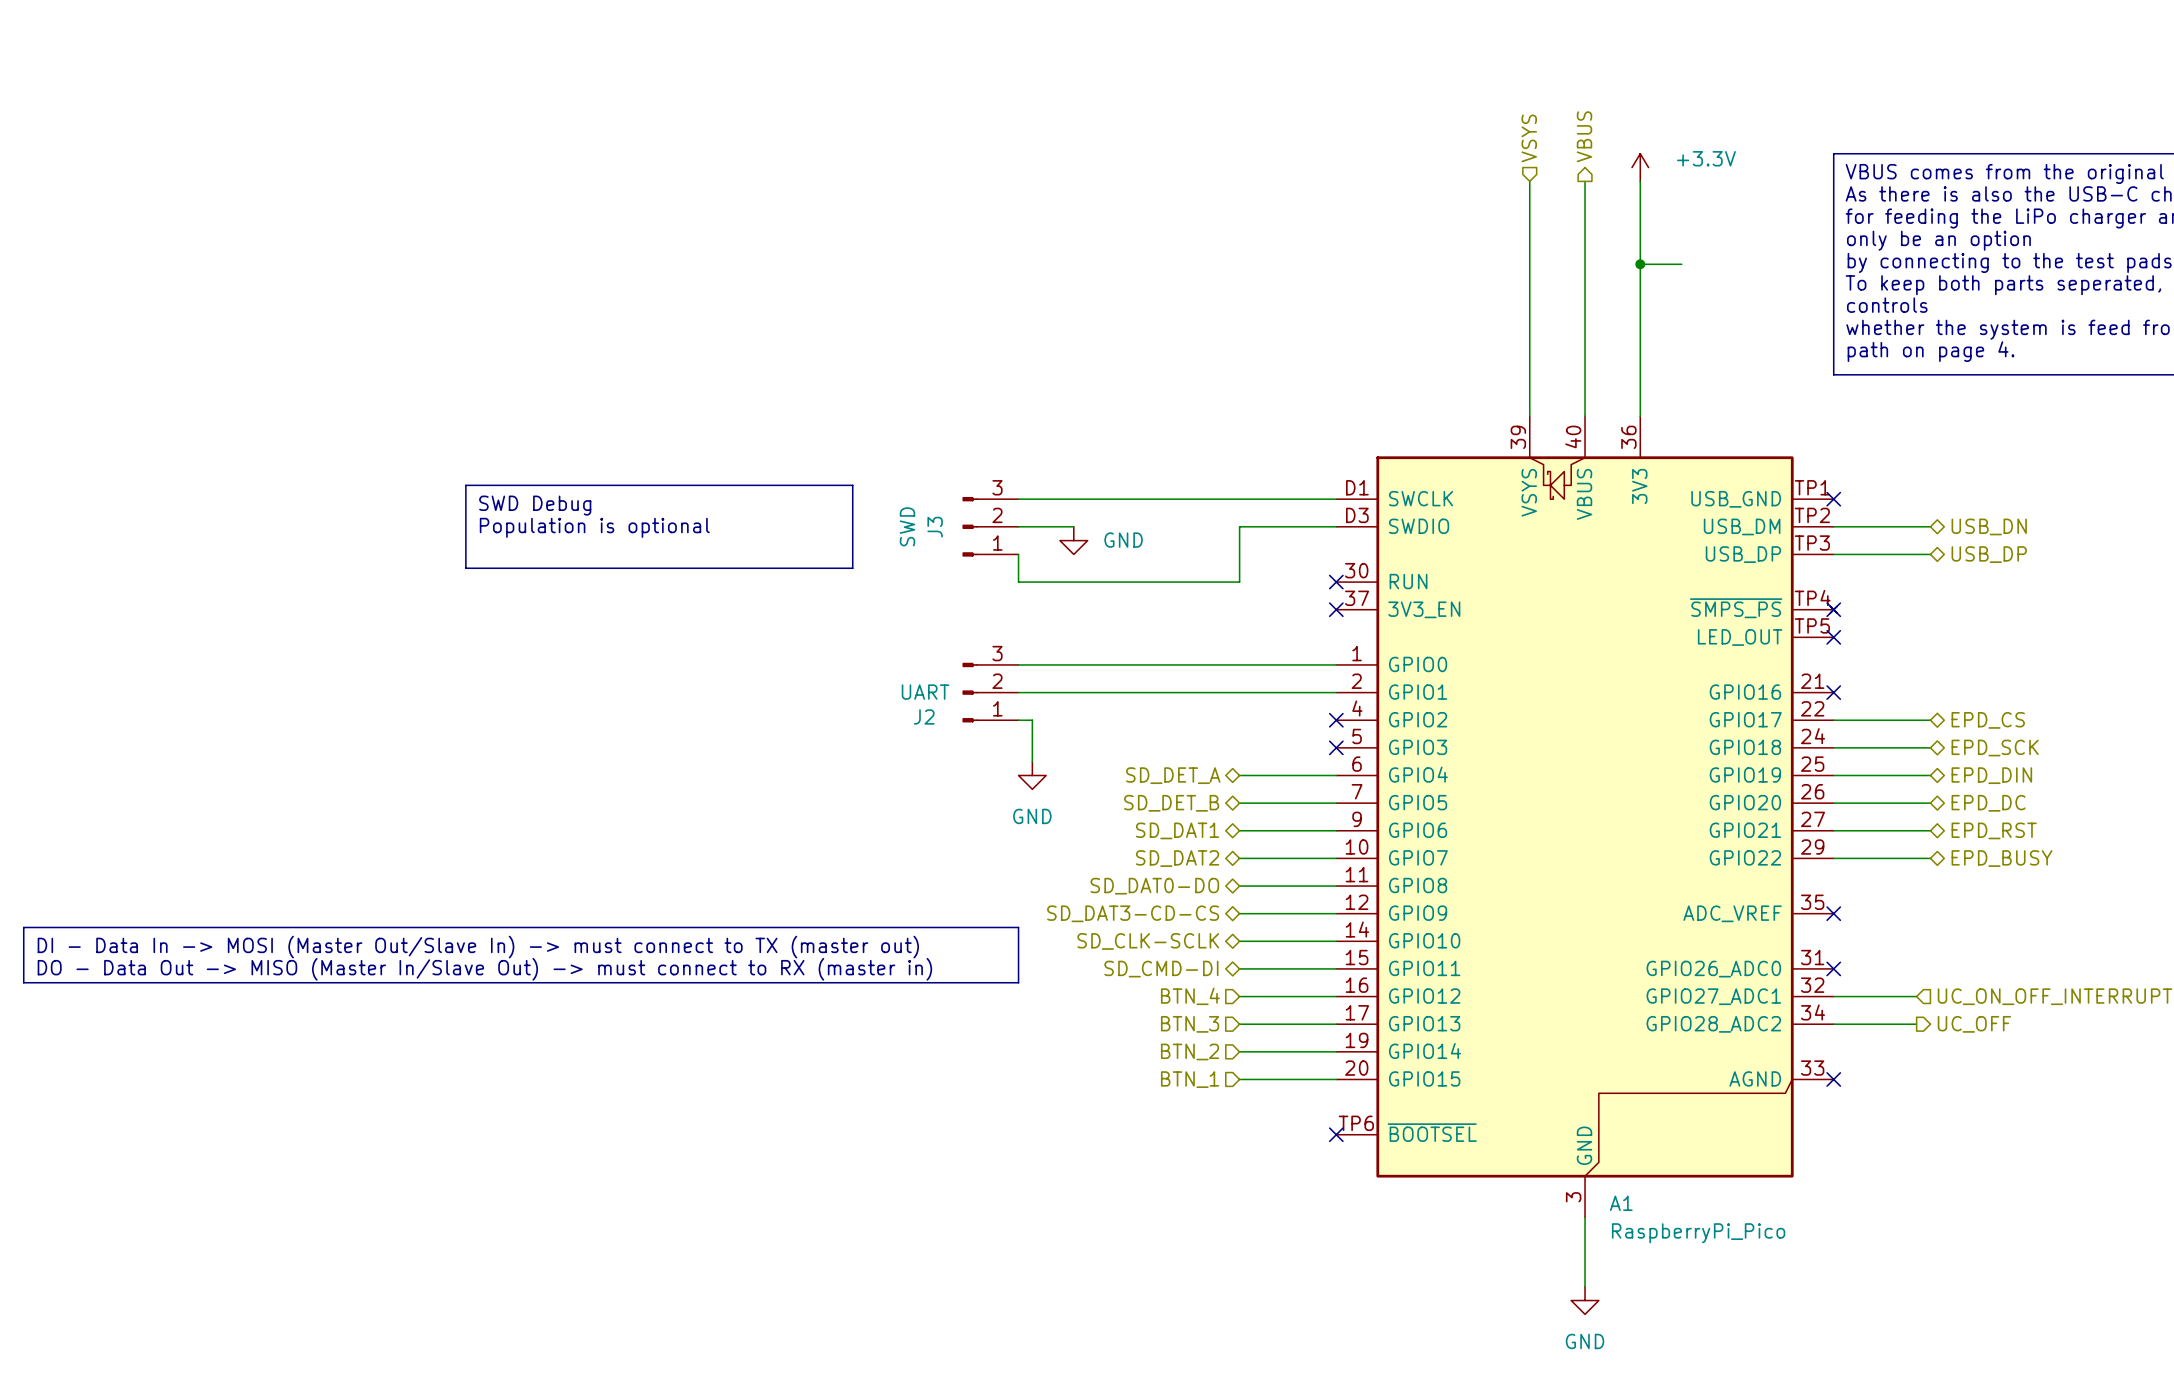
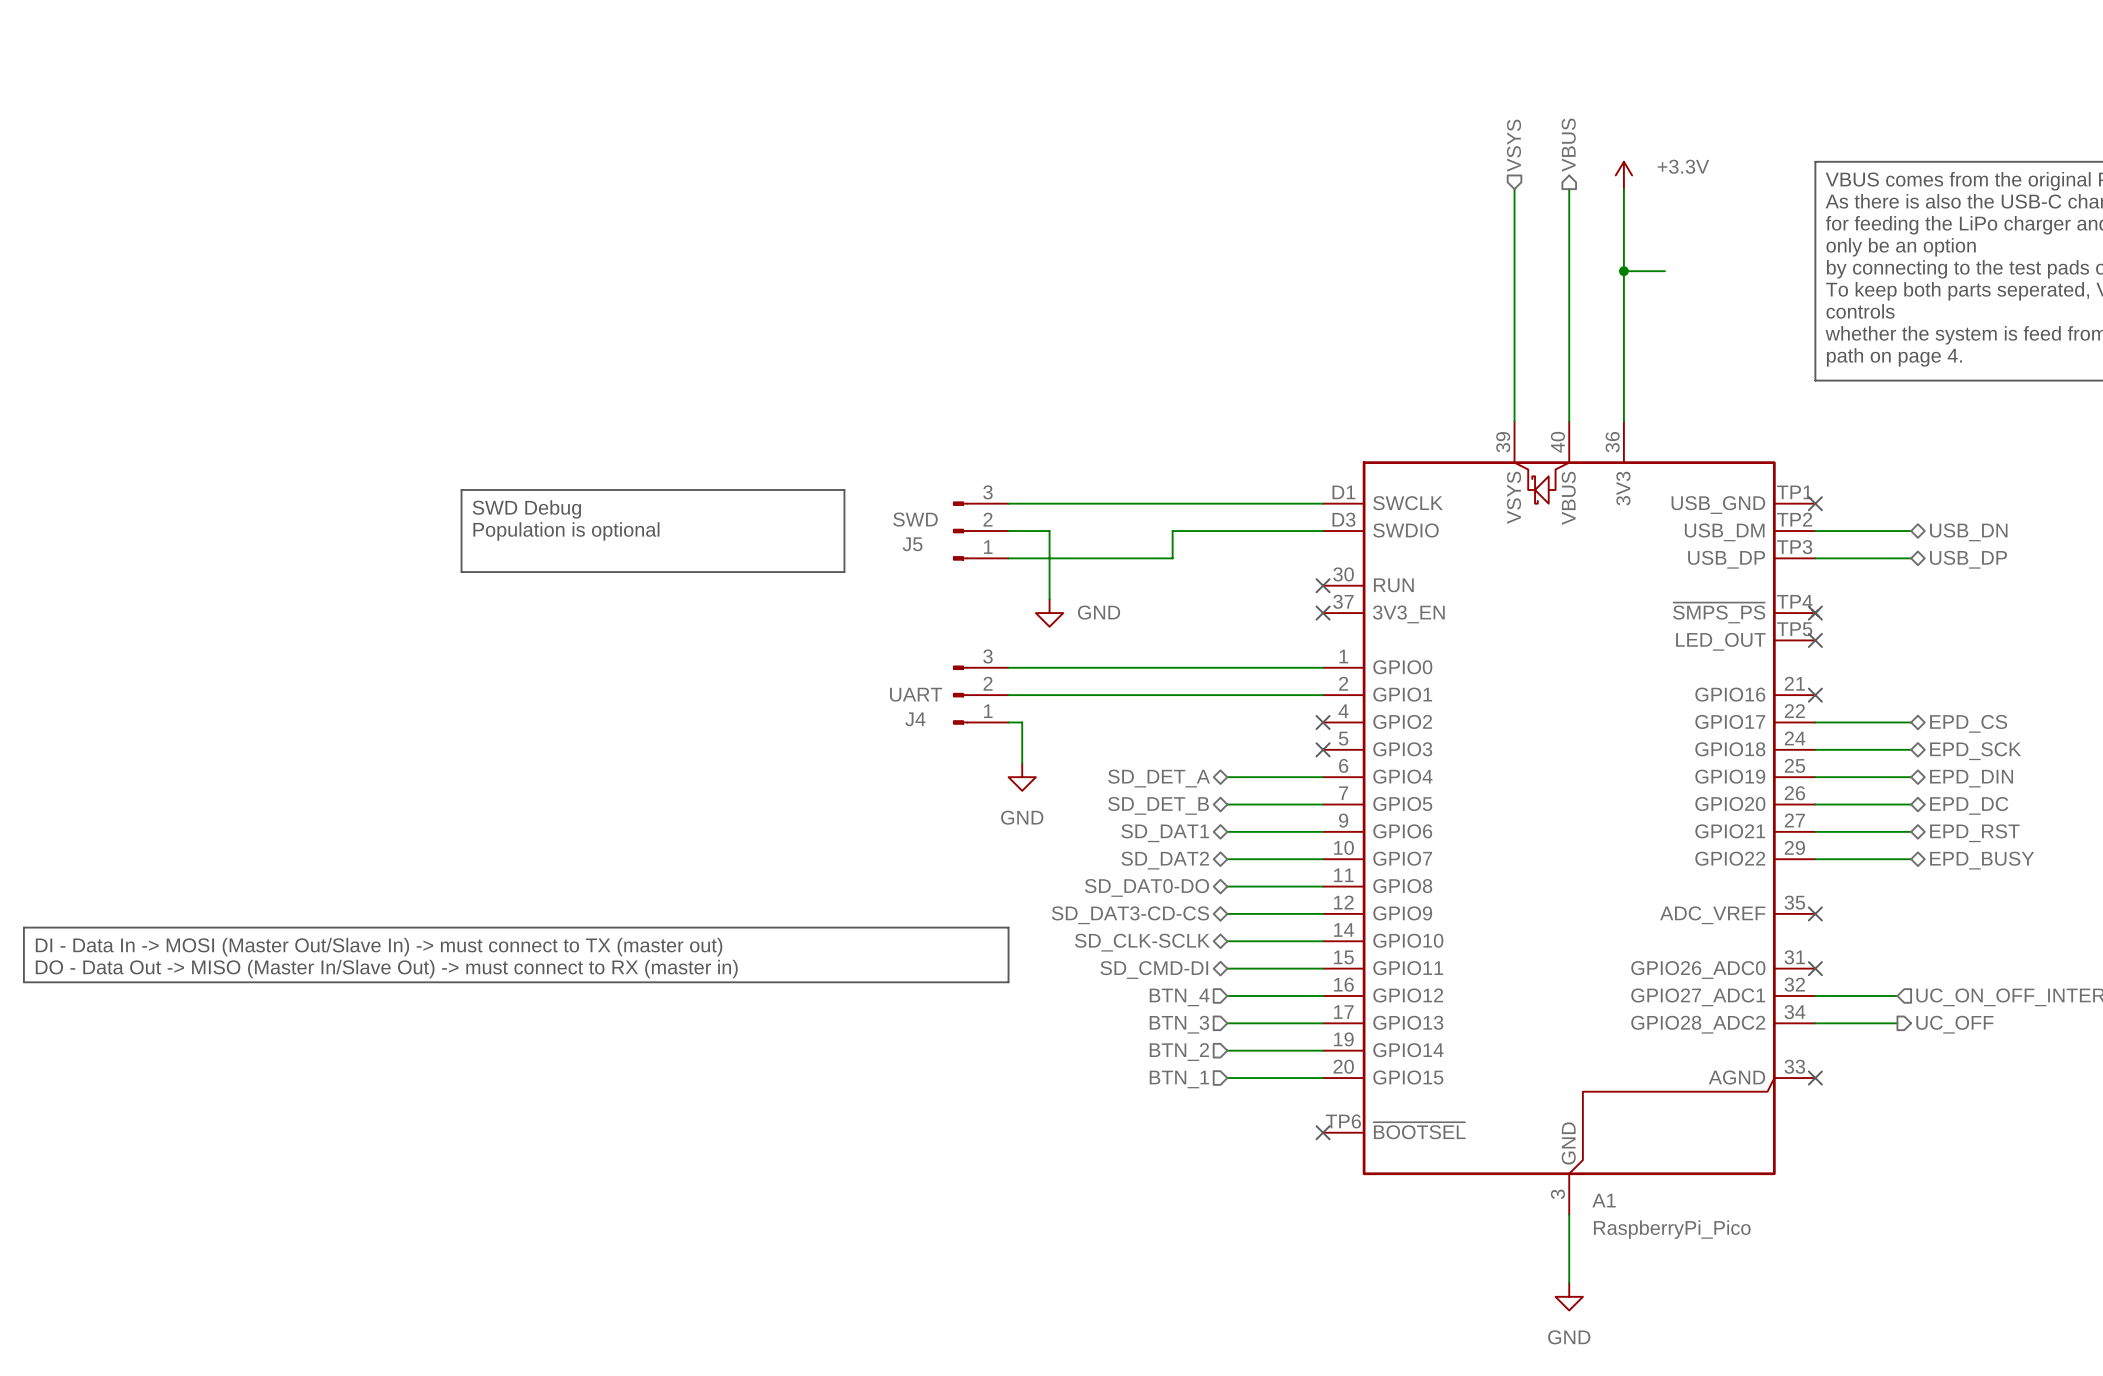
J3 value rotation: 0° (907, 526) -> 90° clockwise (915, 519)
wire: (1059, 526) (1073, 526) -> (1049, 531) (1049, 599)
wire: (1239, 526) (1239, 582) (1018, 582) (1018, 554) -> (1227, 531) (1172, 531) (1172, 558) (1008, 558)
J3 name: J3 (935, 527) -> J5 (912, 544)
power symbol position: GND (1073, 540) -> GND (1049, 613)
J2 name: J2 (924, 716) -> J4 (915, 719)

